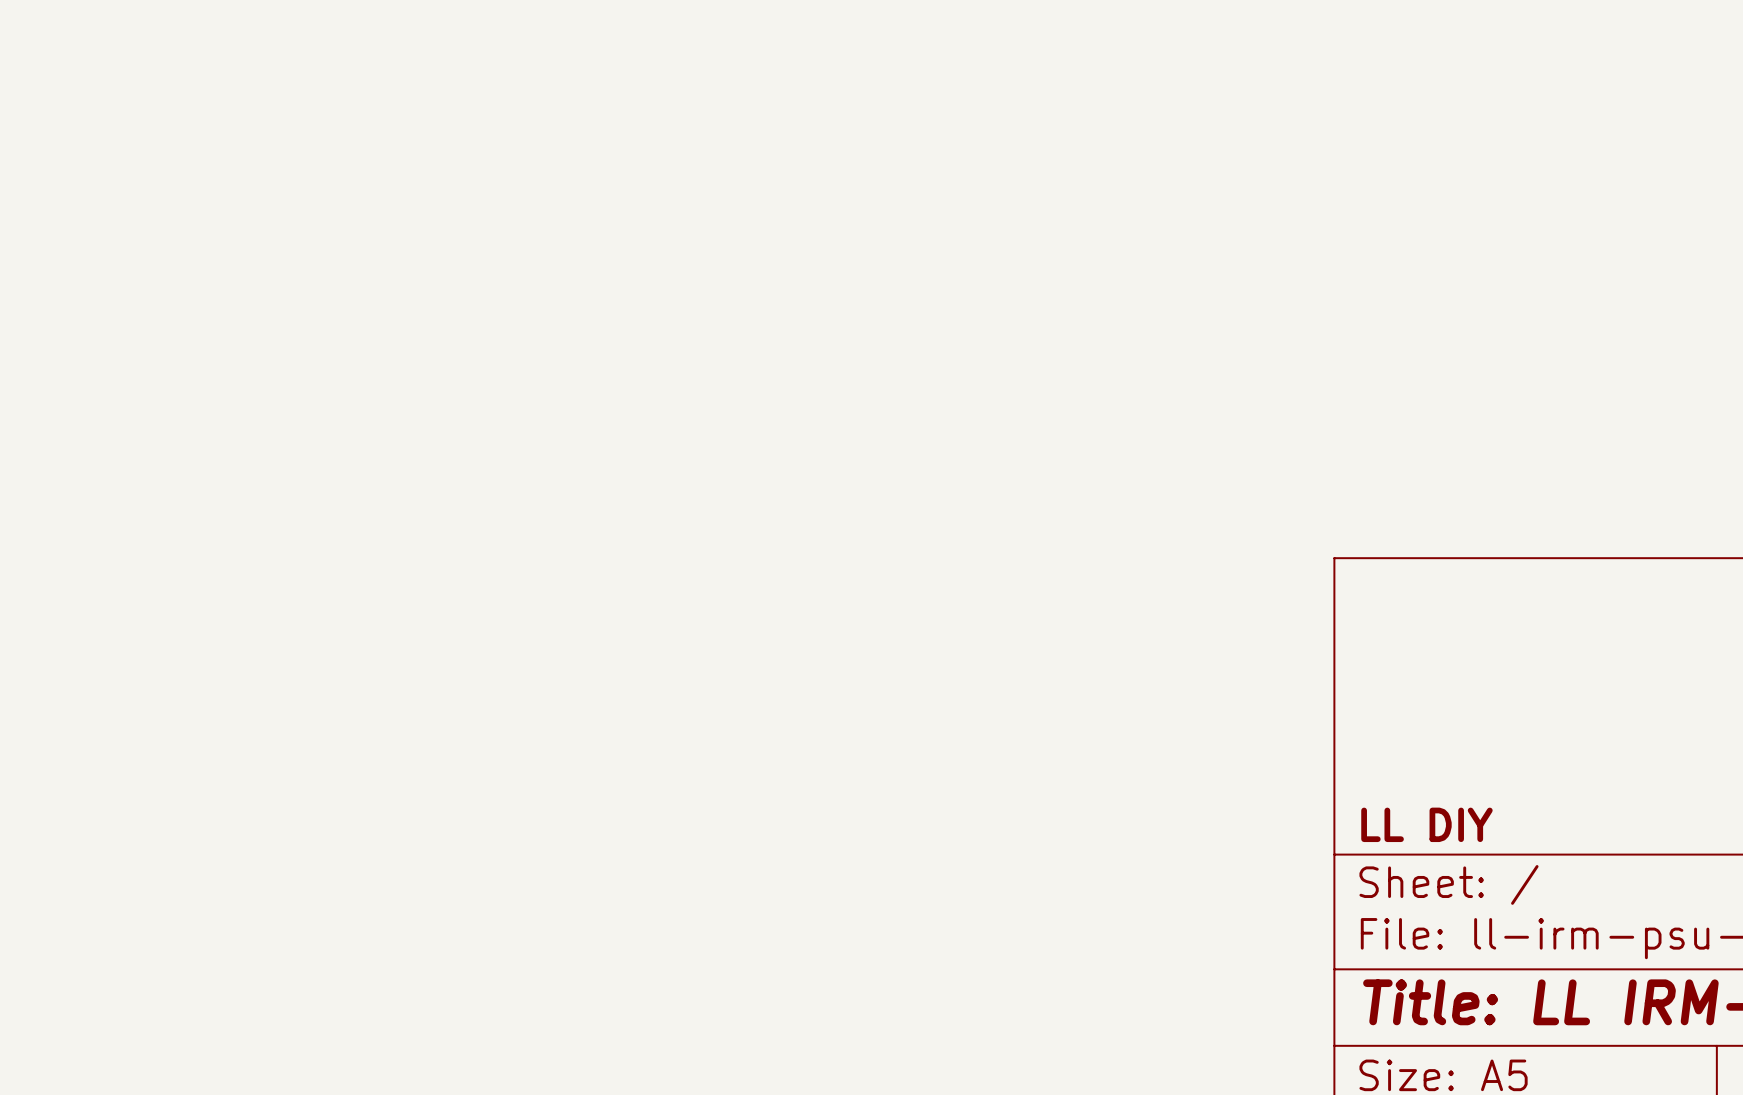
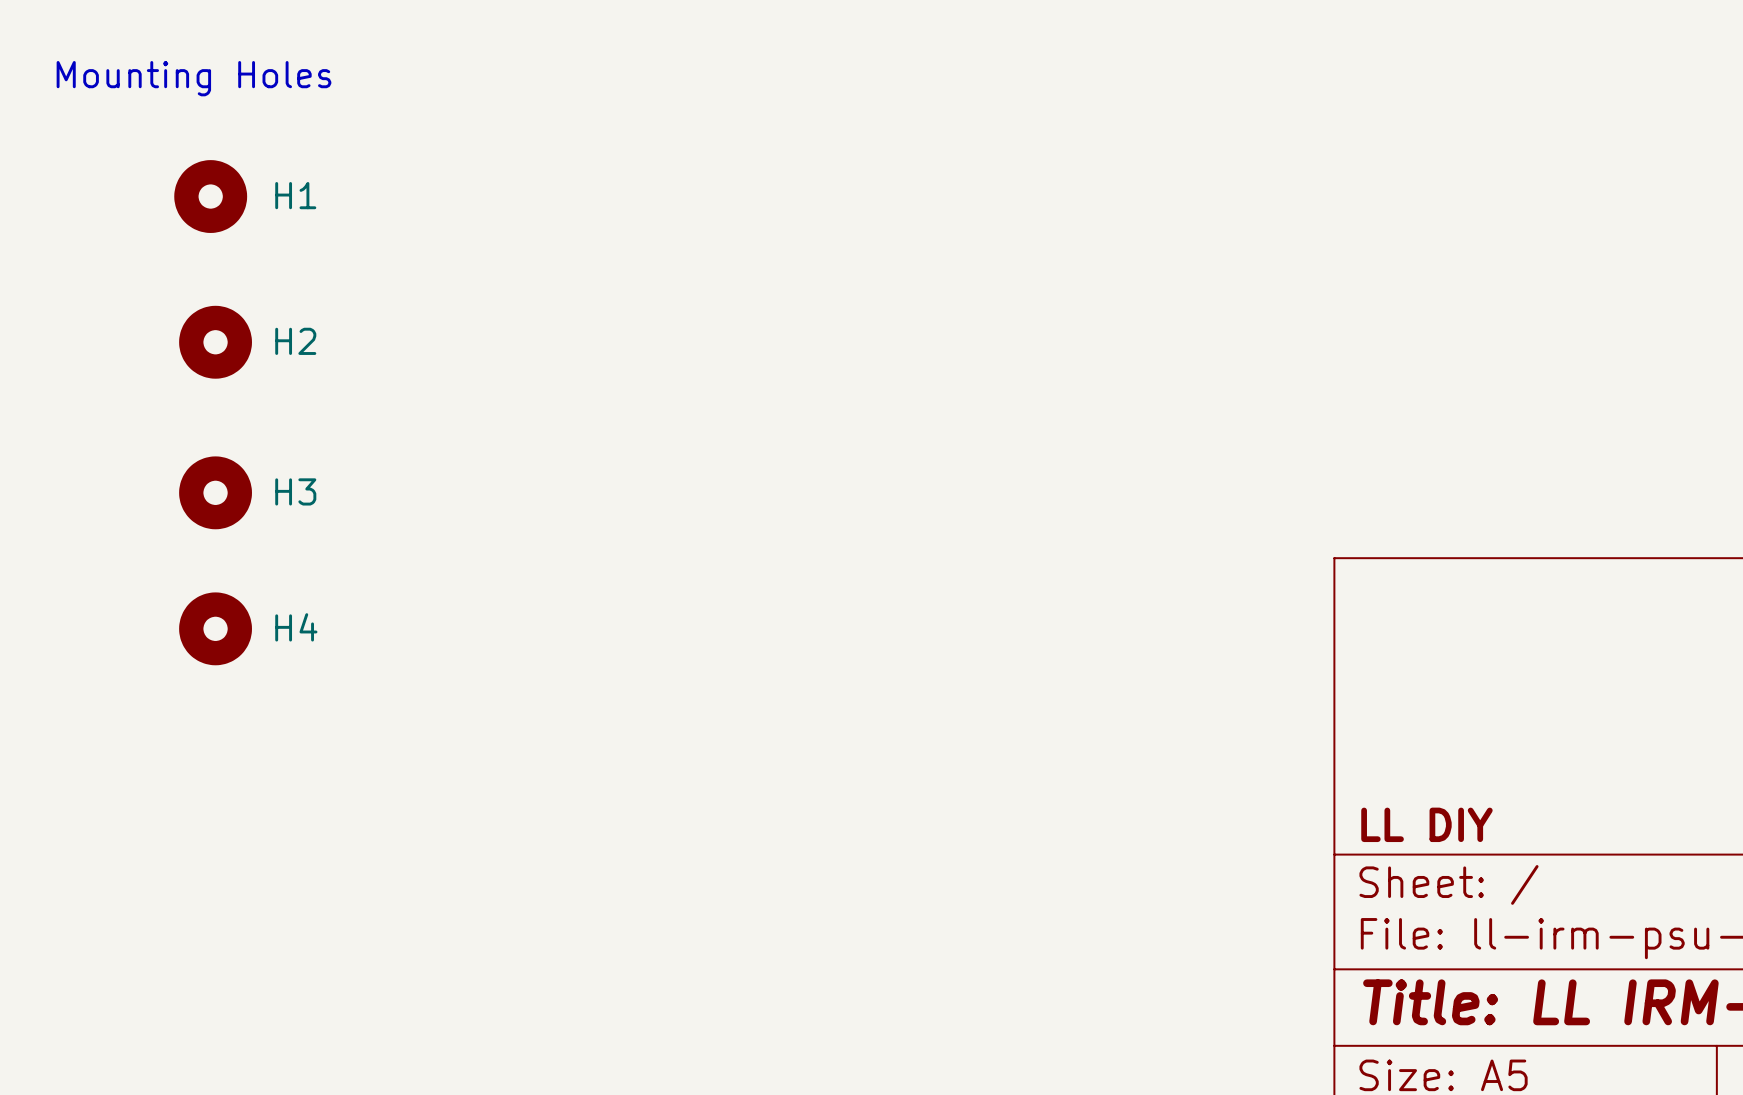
text: none -> Mounting Holes (193, 78)
H1: none -> (210, 196)
H2: none -> (215, 342)
H3: none -> (215, 492)
H4: none -> (215, 628)

